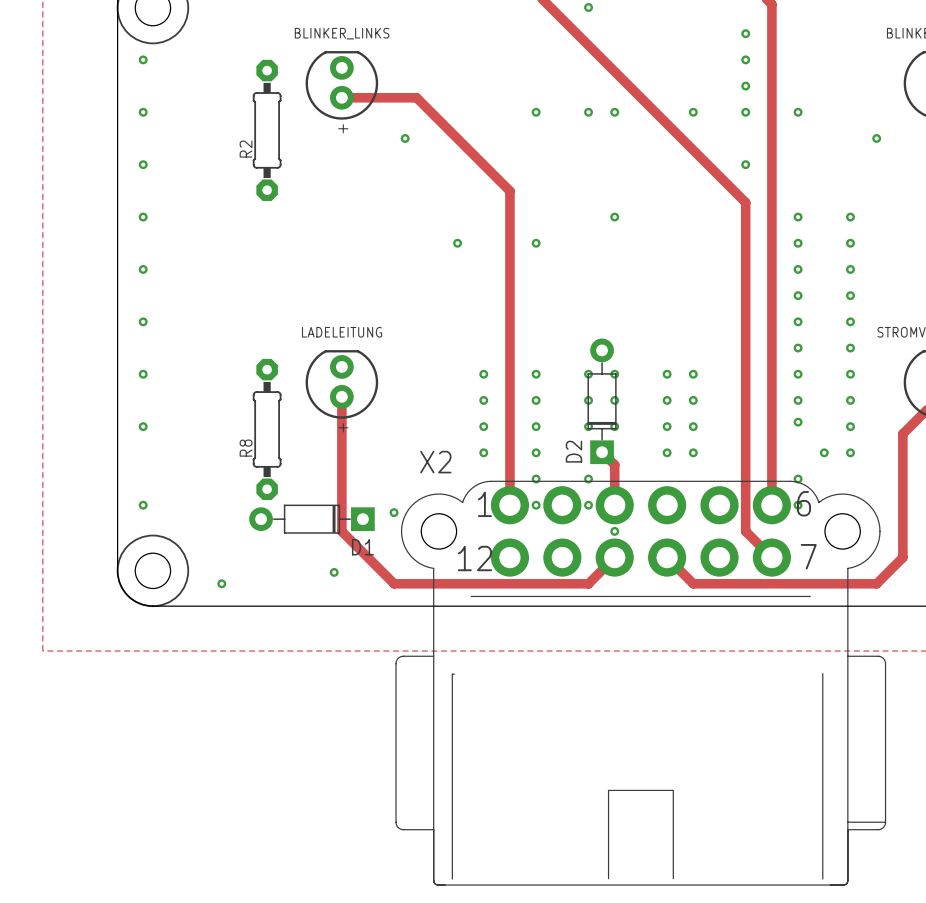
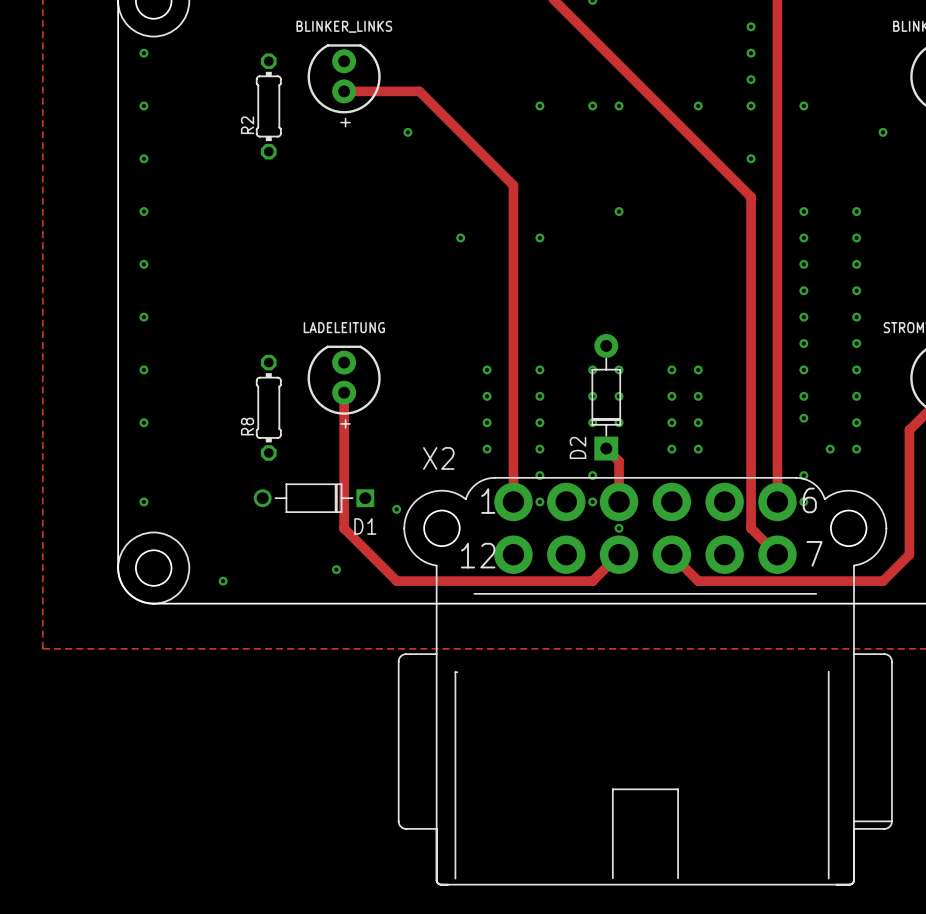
R2 footprint: [252, 59, 282, 201] -> [255, 53, 282, 160]
R8 footprint: [252, 358, 282, 501] -> [255, 354, 282, 461]
D1 footprint: [249, 504, 375, 534] -> [253, 483, 375, 513]

